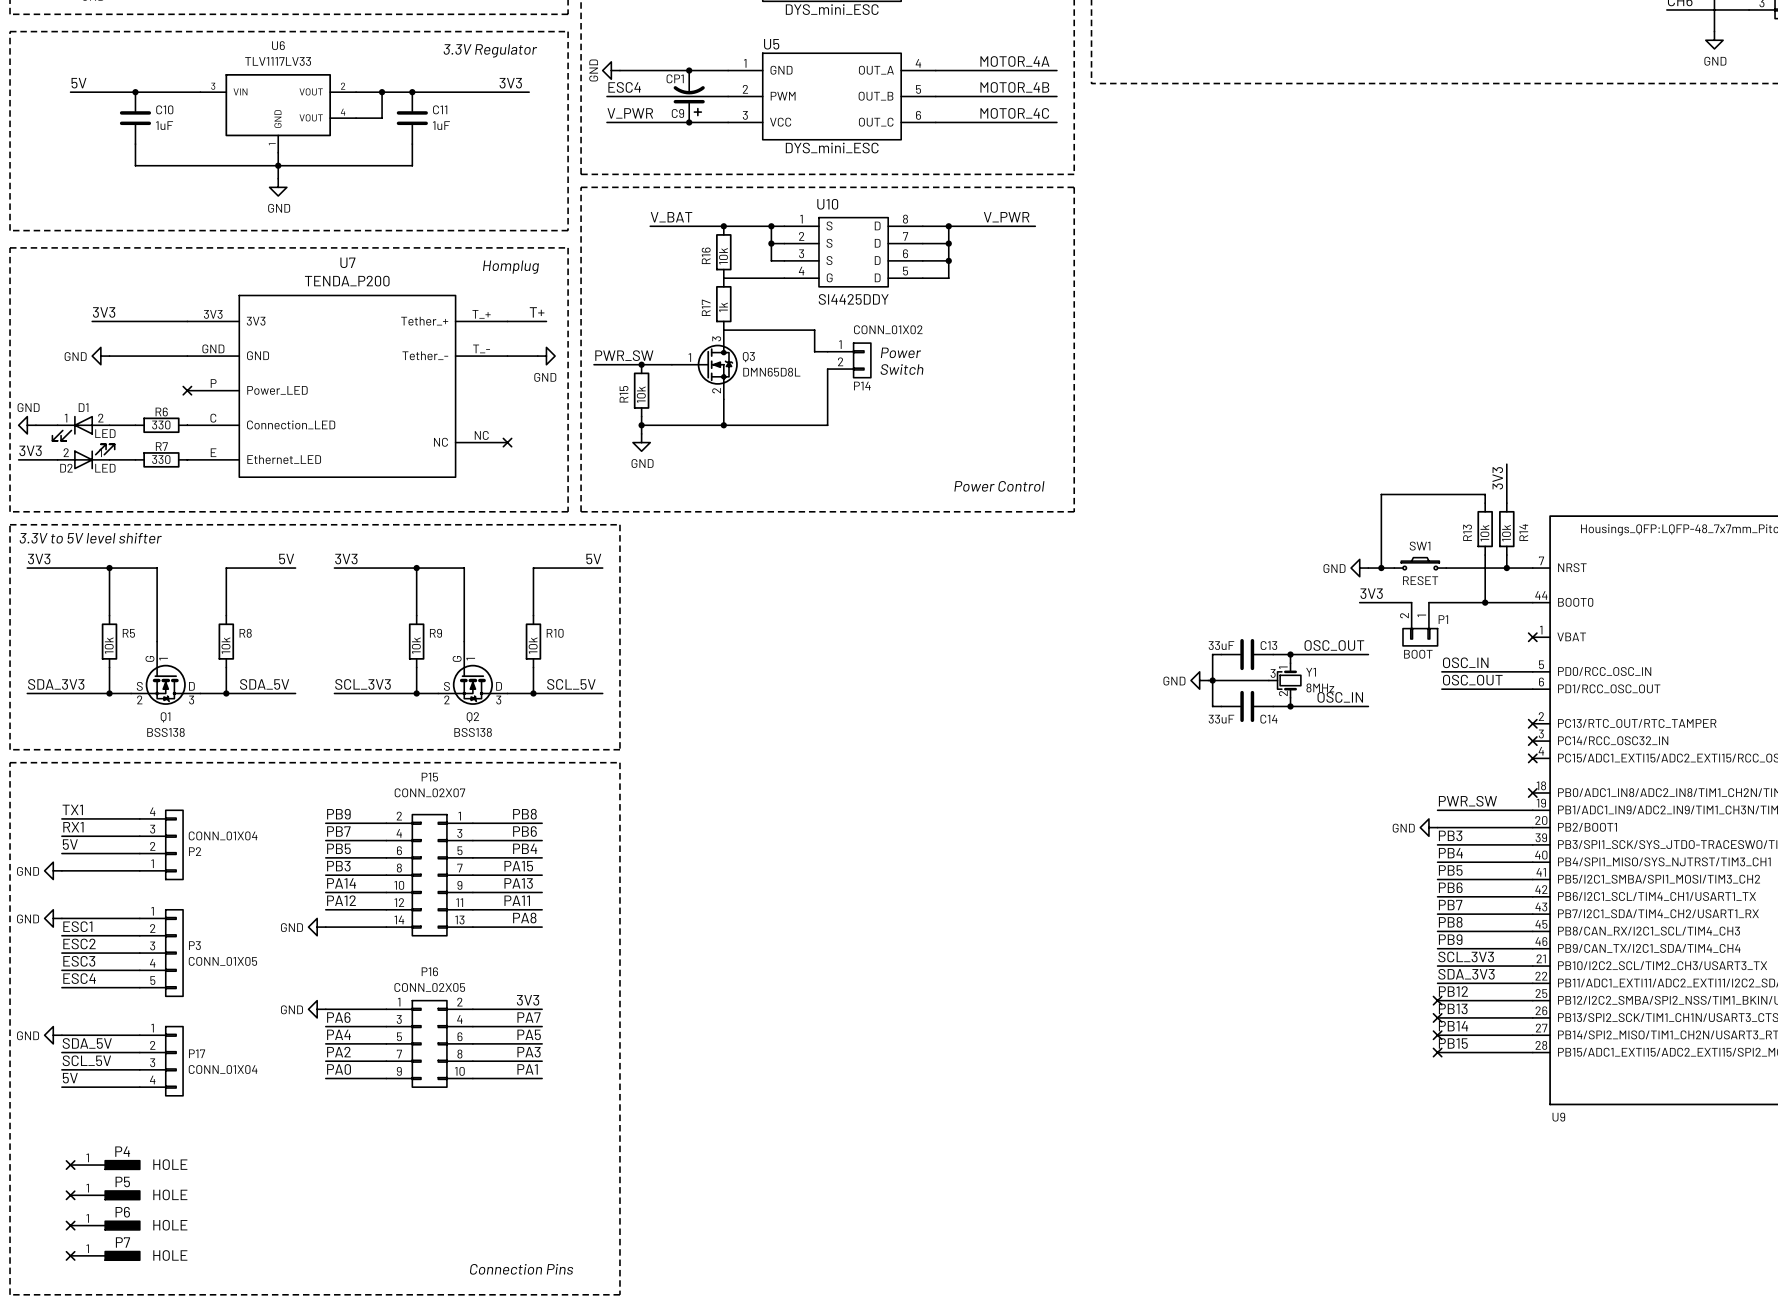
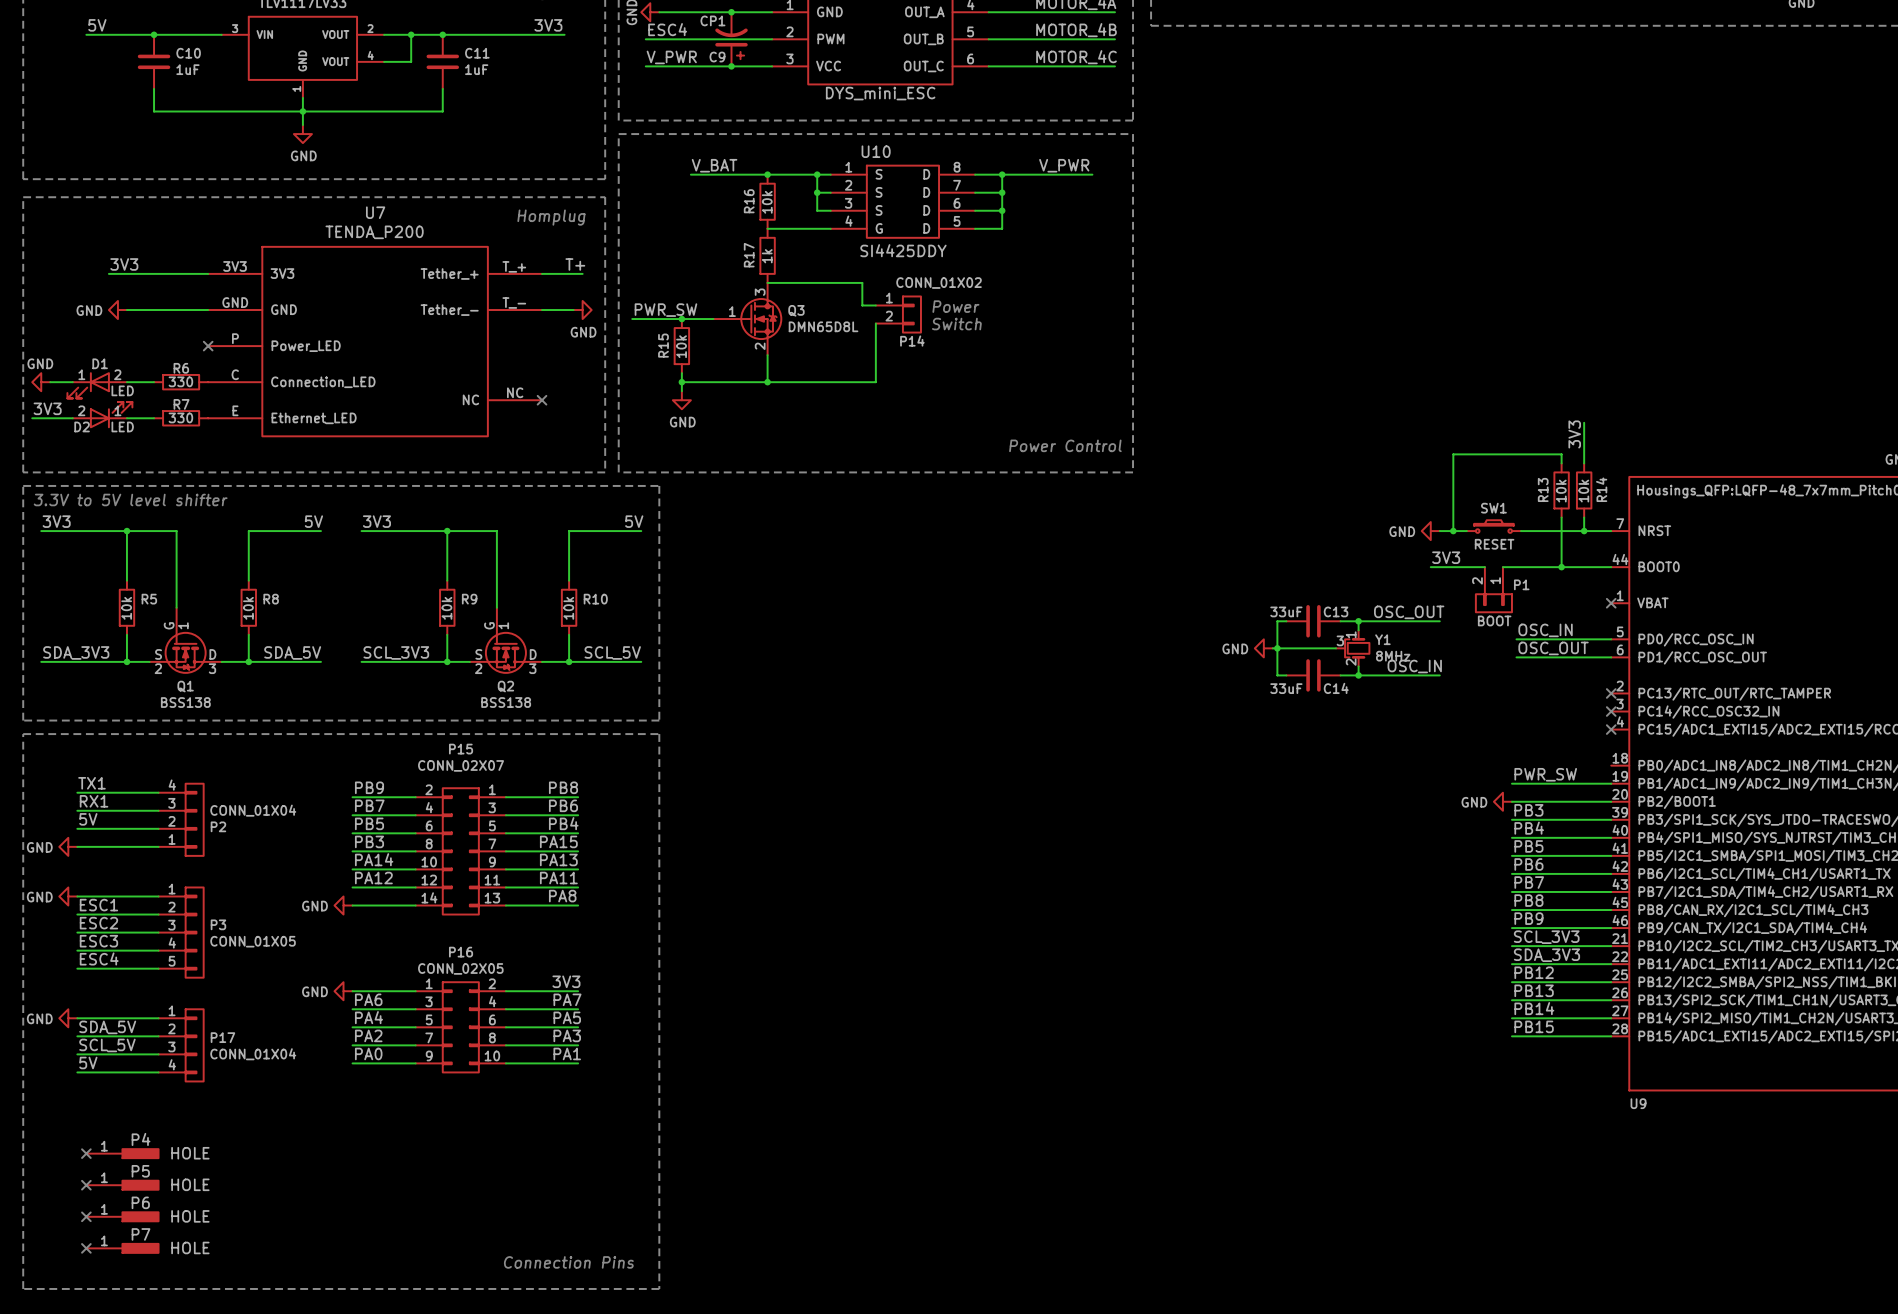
no-connect mark: (1532, 792) -> none
no-connect mark: (1437, 1000) -> none
no-connect mark: (1437, 1017) -> none
no-connect mark: (1437, 1035) -> none
no-connect mark: (1437, 1052) -> none

